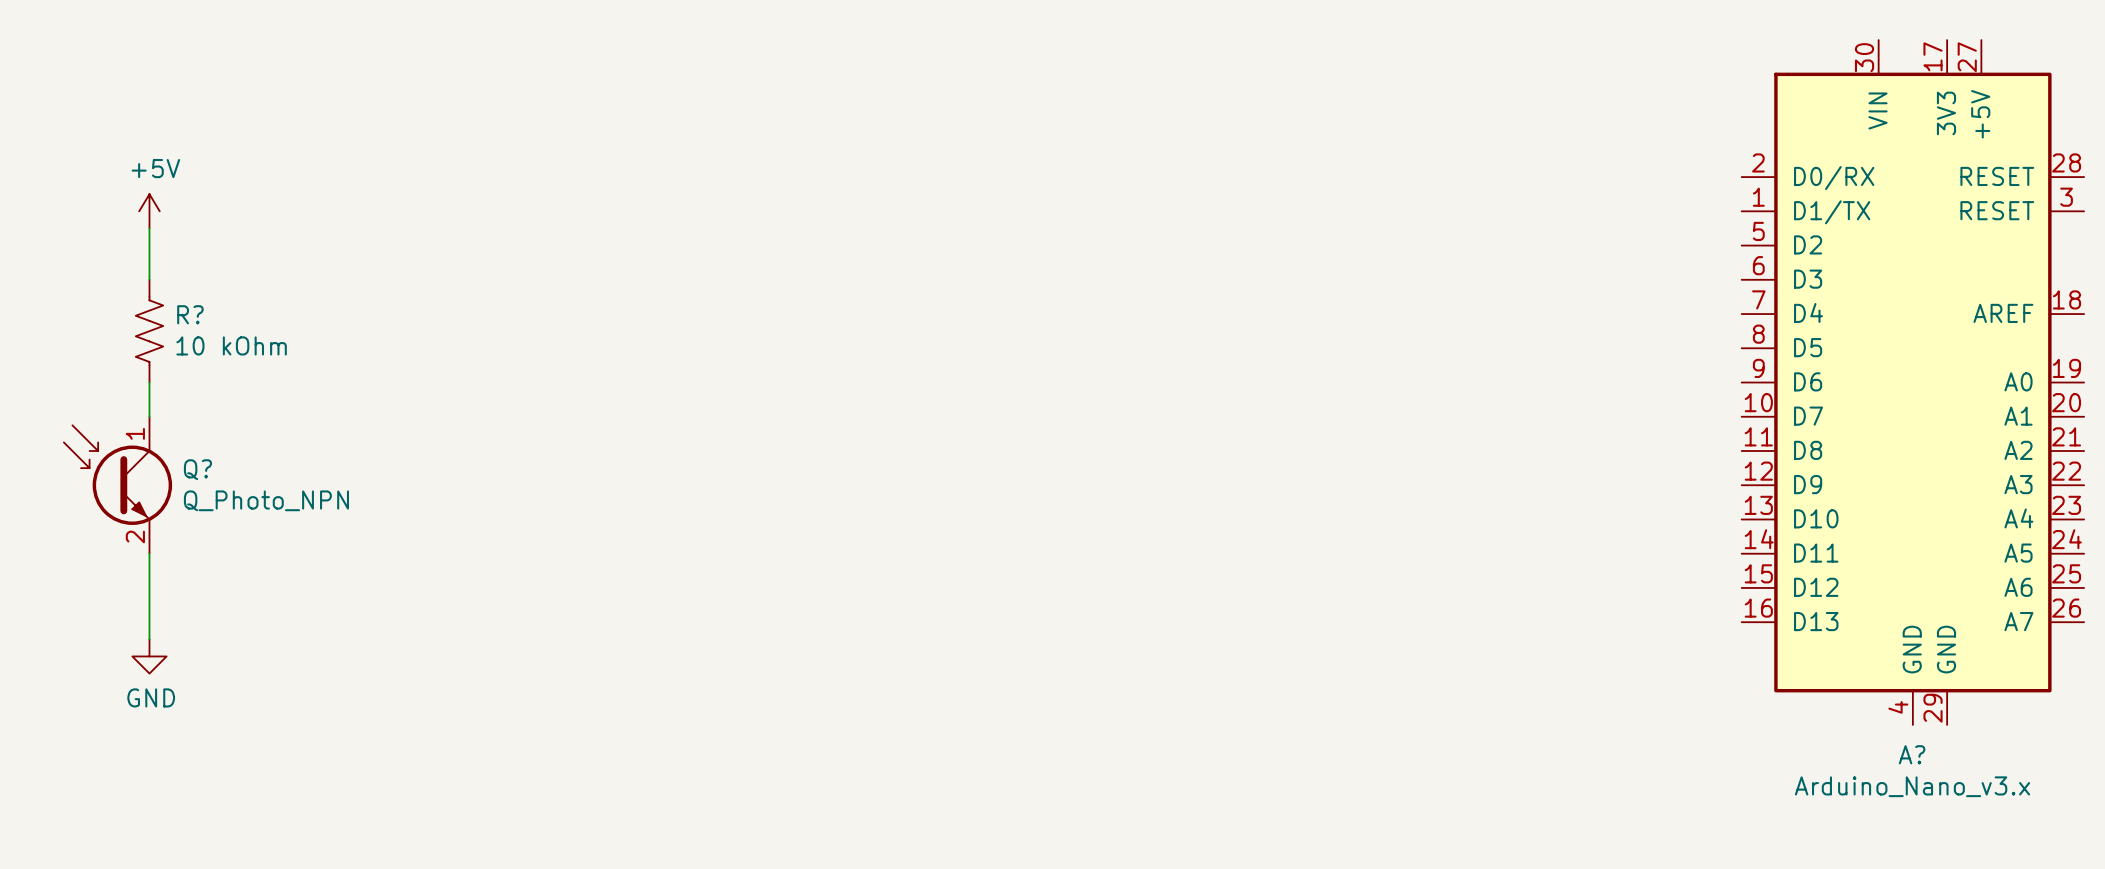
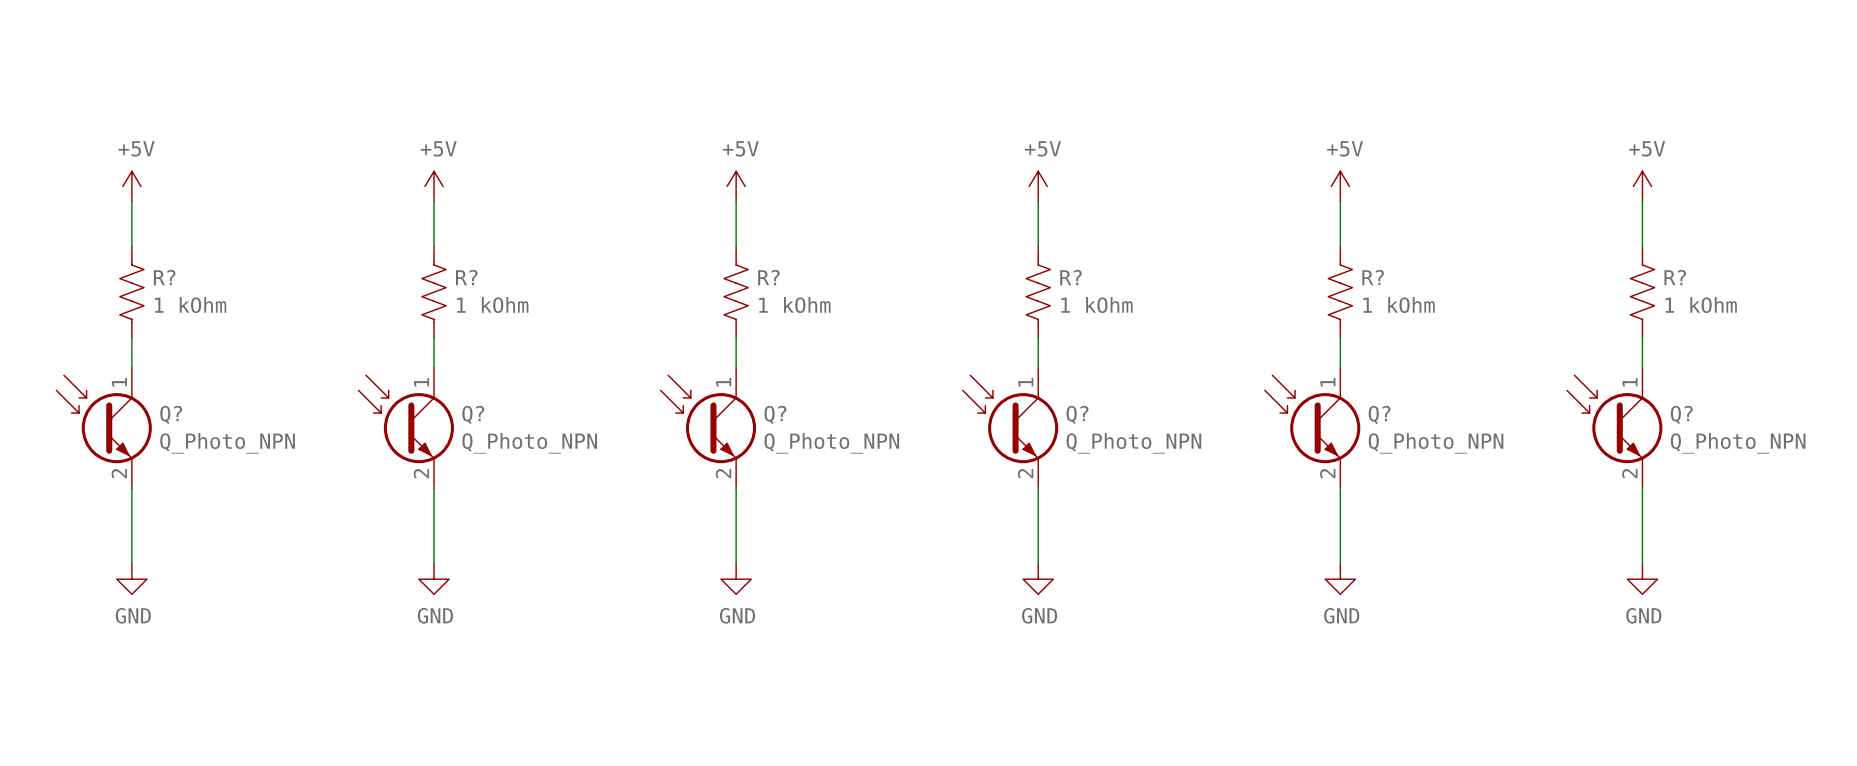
power symbol: none -> +5V (434, 186)
power symbol: none -> +5V (736, 186)
power symbol: none -> +5V (1038, 186)
power symbol: none -> +5V (1340, 186)
power symbol: none -> +5V (1642, 186)
wire: none -> (434, 201) (434, 246)
wire: none -> (736, 201) (736, 246)
wire: none -> (1038, 201) (1038, 246)
wire: none -> (1340, 201) (1340, 246)
R?: none -> 1 kOhm (434, 292)
R?: none -> 1 kOhm (736, 292)
R?: none -> 1 kOhm (1038, 292)
R?: none -> 1 kOhm (1340, 292)
R?: none -> 1 kOhm (1642, 292)
R? value: 10 kOhm (231, 345) -> 1 kOhm (190, 305)
wire: none -> (434, 337) (434, 367)
wire: none -> (736, 337) (736, 367)
wire: none -> (1038, 337) (1038, 367)
wire: none -> (1340, 337) (1340, 367)
A?: Arduino_Nano_v3.x (1912, 382) -> none
Q?: none -> Q_Photo_NPN (406, 428)
Q?: none -> Q_Photo_NPN (708, 428)
Q?: none -> Q_Photo_NPN (1010, 428)
Q?: none -> Q_Photo_NPN (1312, 428)
Q?: none -> Q_Photo_NPN (1614, 428)
wire: none -> (434, 488) (434, 564)
wire: none -> (736, 488) (736, 564)
wire: none -> (1038, 488) (1038, 564)
wire: none -> (1340, 488) (1340, 564)
power symbol: none -> GND (434, 579)
power symbol: none -> GND (736, 579)
power symbol: none -> GND (1038, 579)
power symbol: none -> GND (1340, 579)
power symbol: none -> GND (1642, 579)

